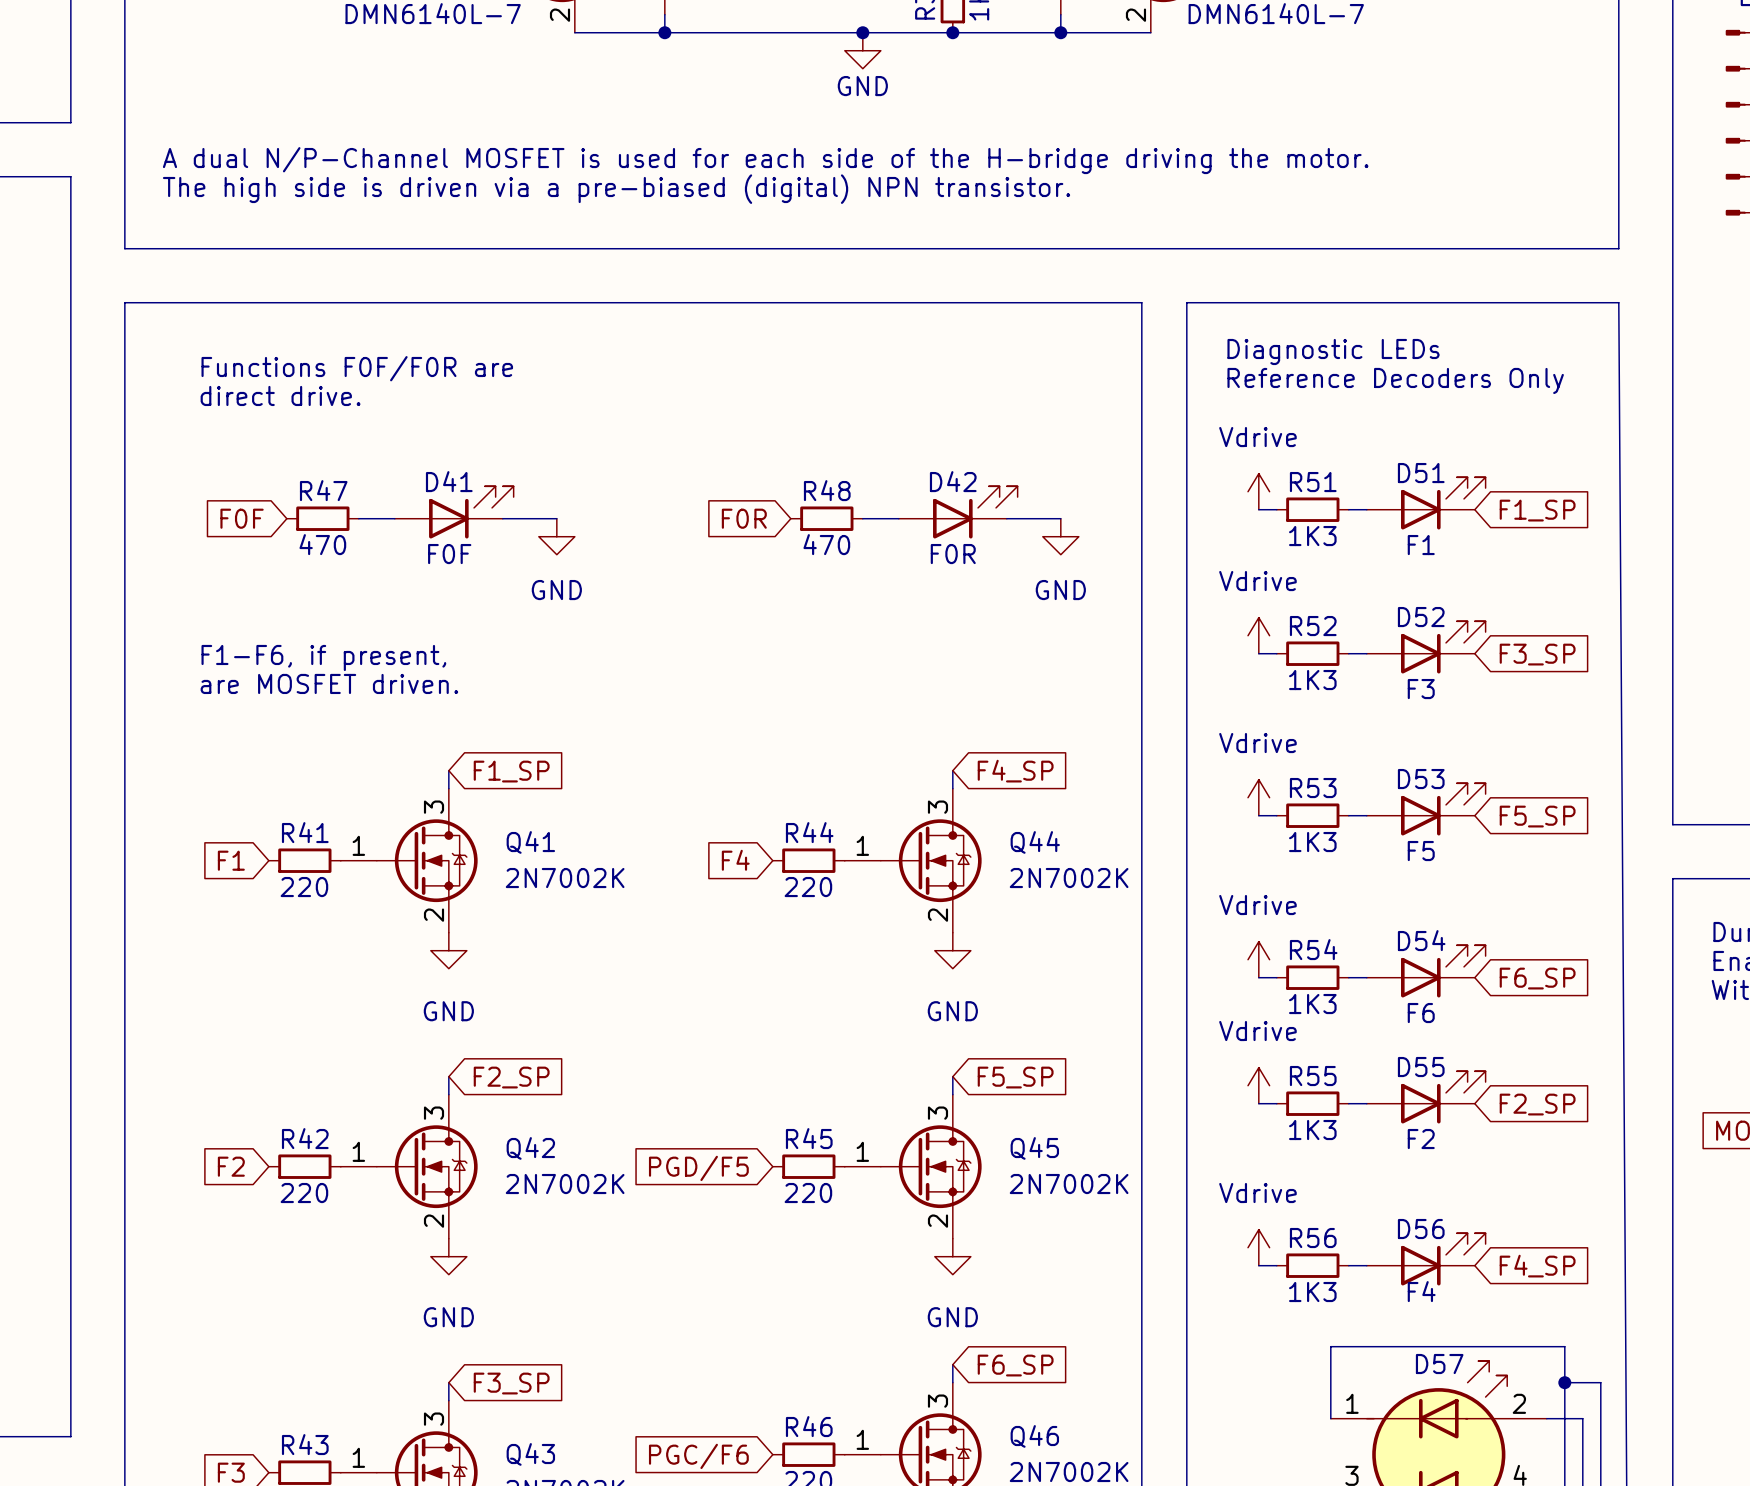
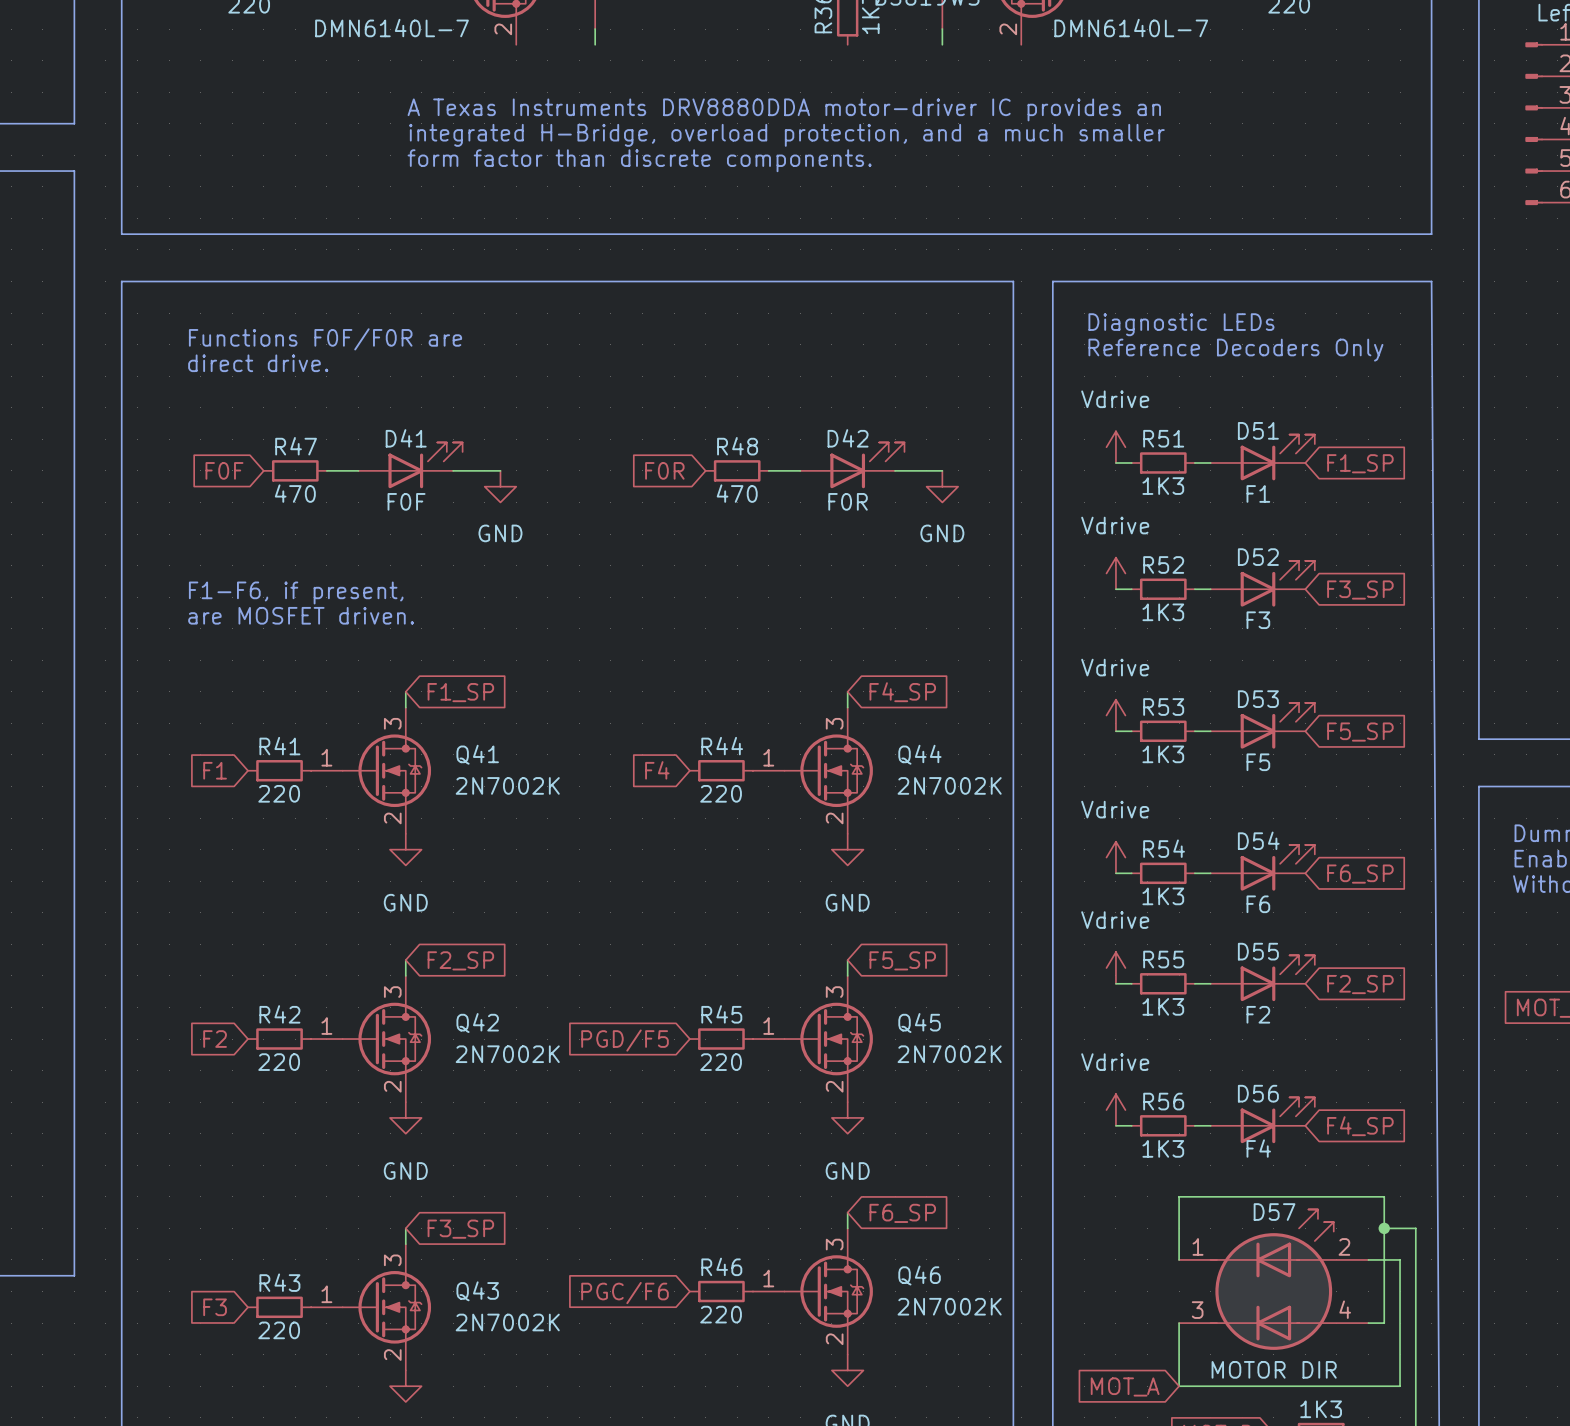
wire: (574, 32) (1150, 32) -> none
junction: (664, 32) -> none
junction: (862, 32) -> none
junction: (952, 32) -> none
junction: (1060, 32) -> none
power symbol: GND (862, 50) -> none
text: none -> A Texas Instruments DRV8880DDA motor-driver IC provides an (784, 109)
text: none -> integrated H-Bridge, overload protection, and a much smaller (786, 135)
text: A dual N/P-Channel MOSFET is used for each side of the H-bridge driving the motor. (765, 160) -> none
text: none -> form factor than discrete components. (639, 160)
text: The high side is driven via a pre-biased (digital) NPN transistor. (616, 189) -> none

